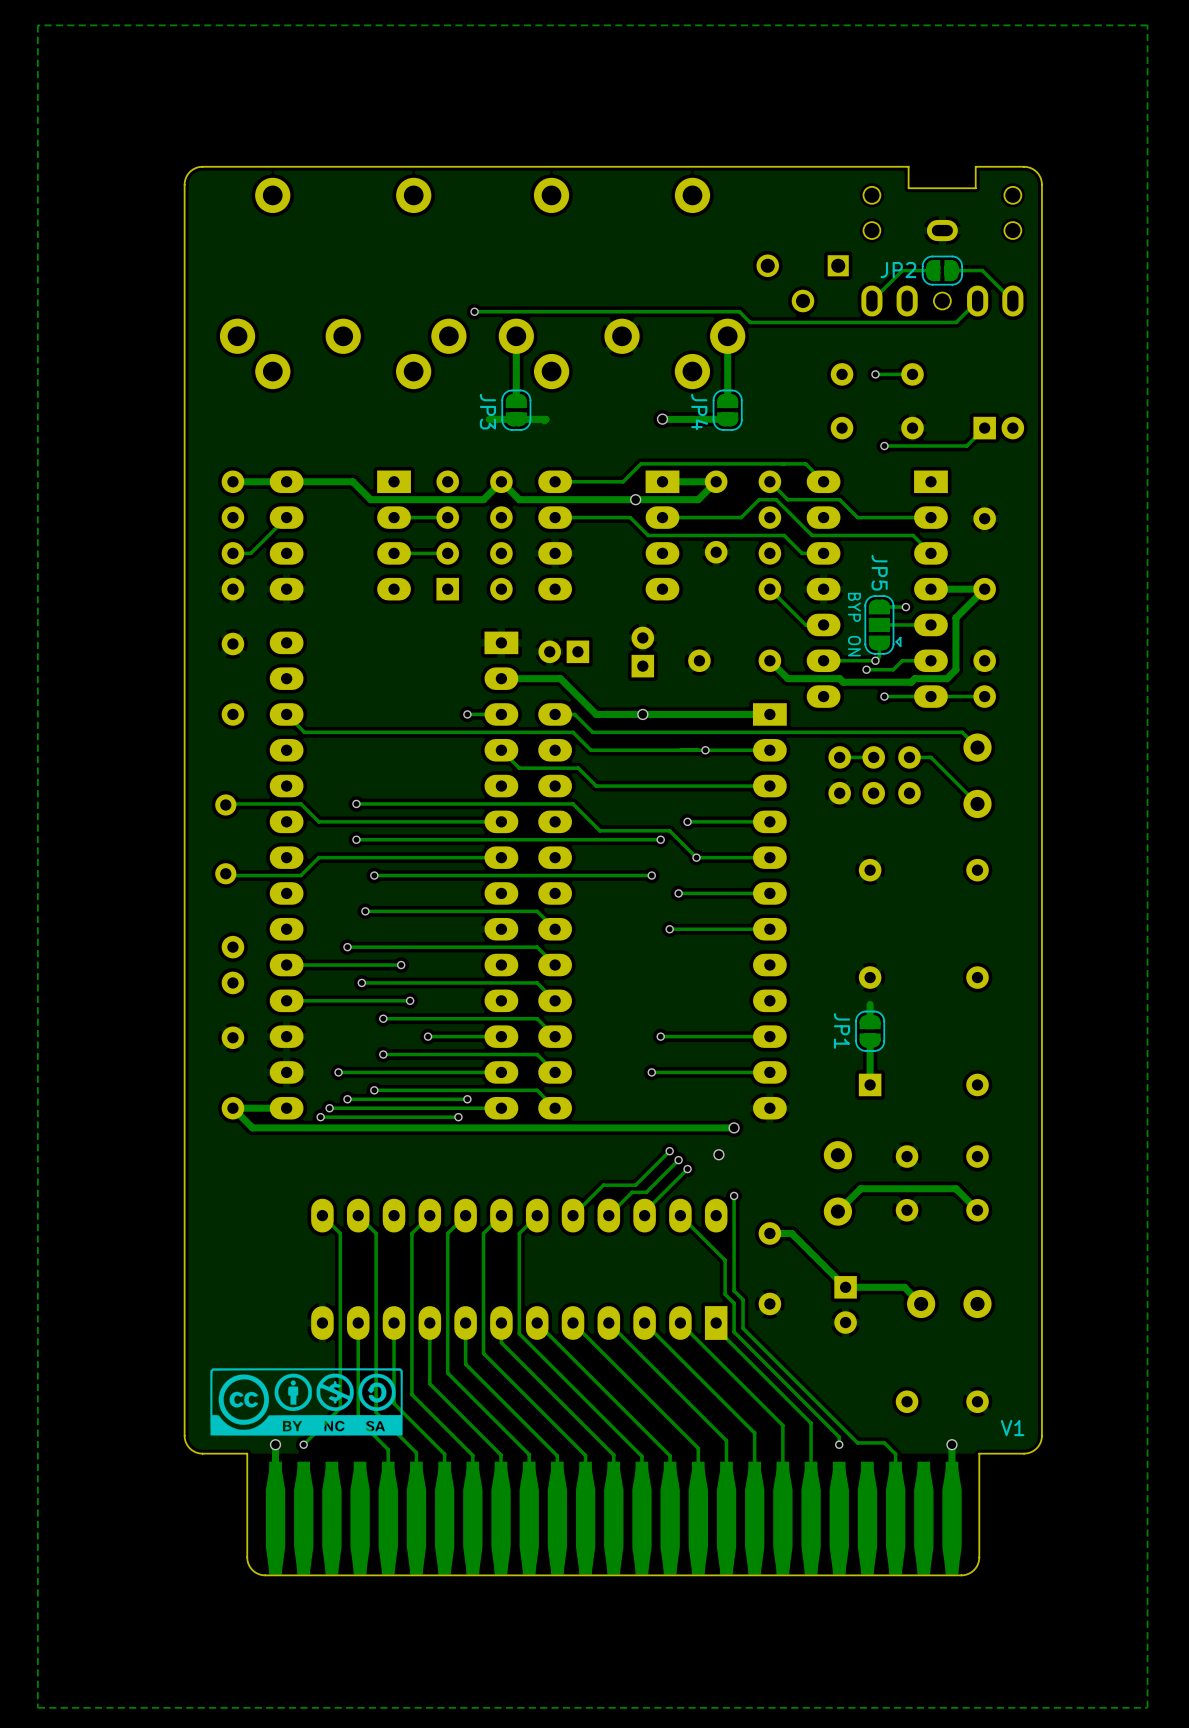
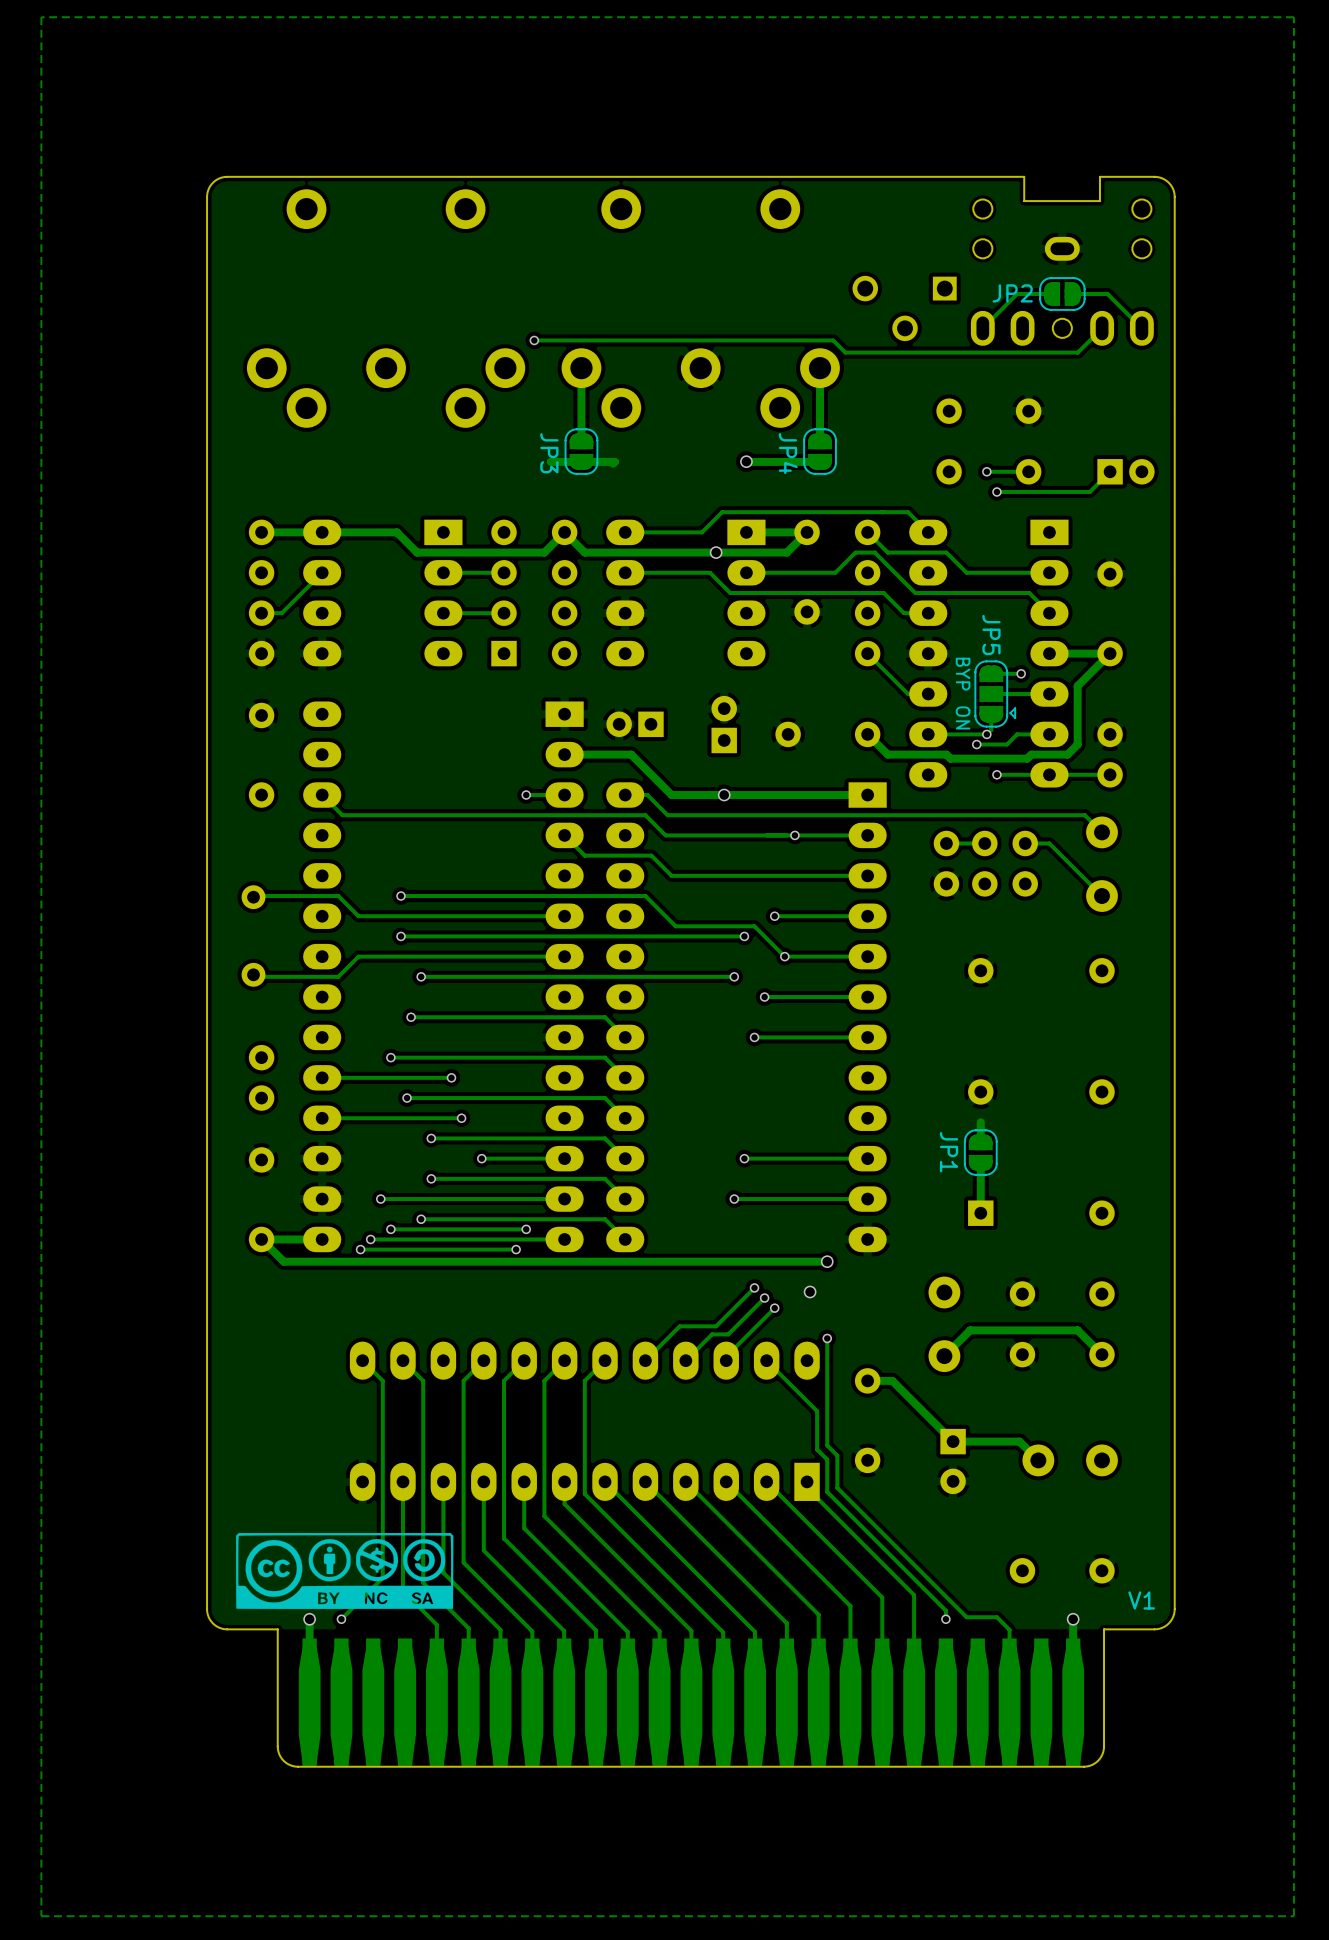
via position: (875, 374) -> (986, 471)
track: (912, 374) (875, 374) -> (1028, 471) (986, 471)

